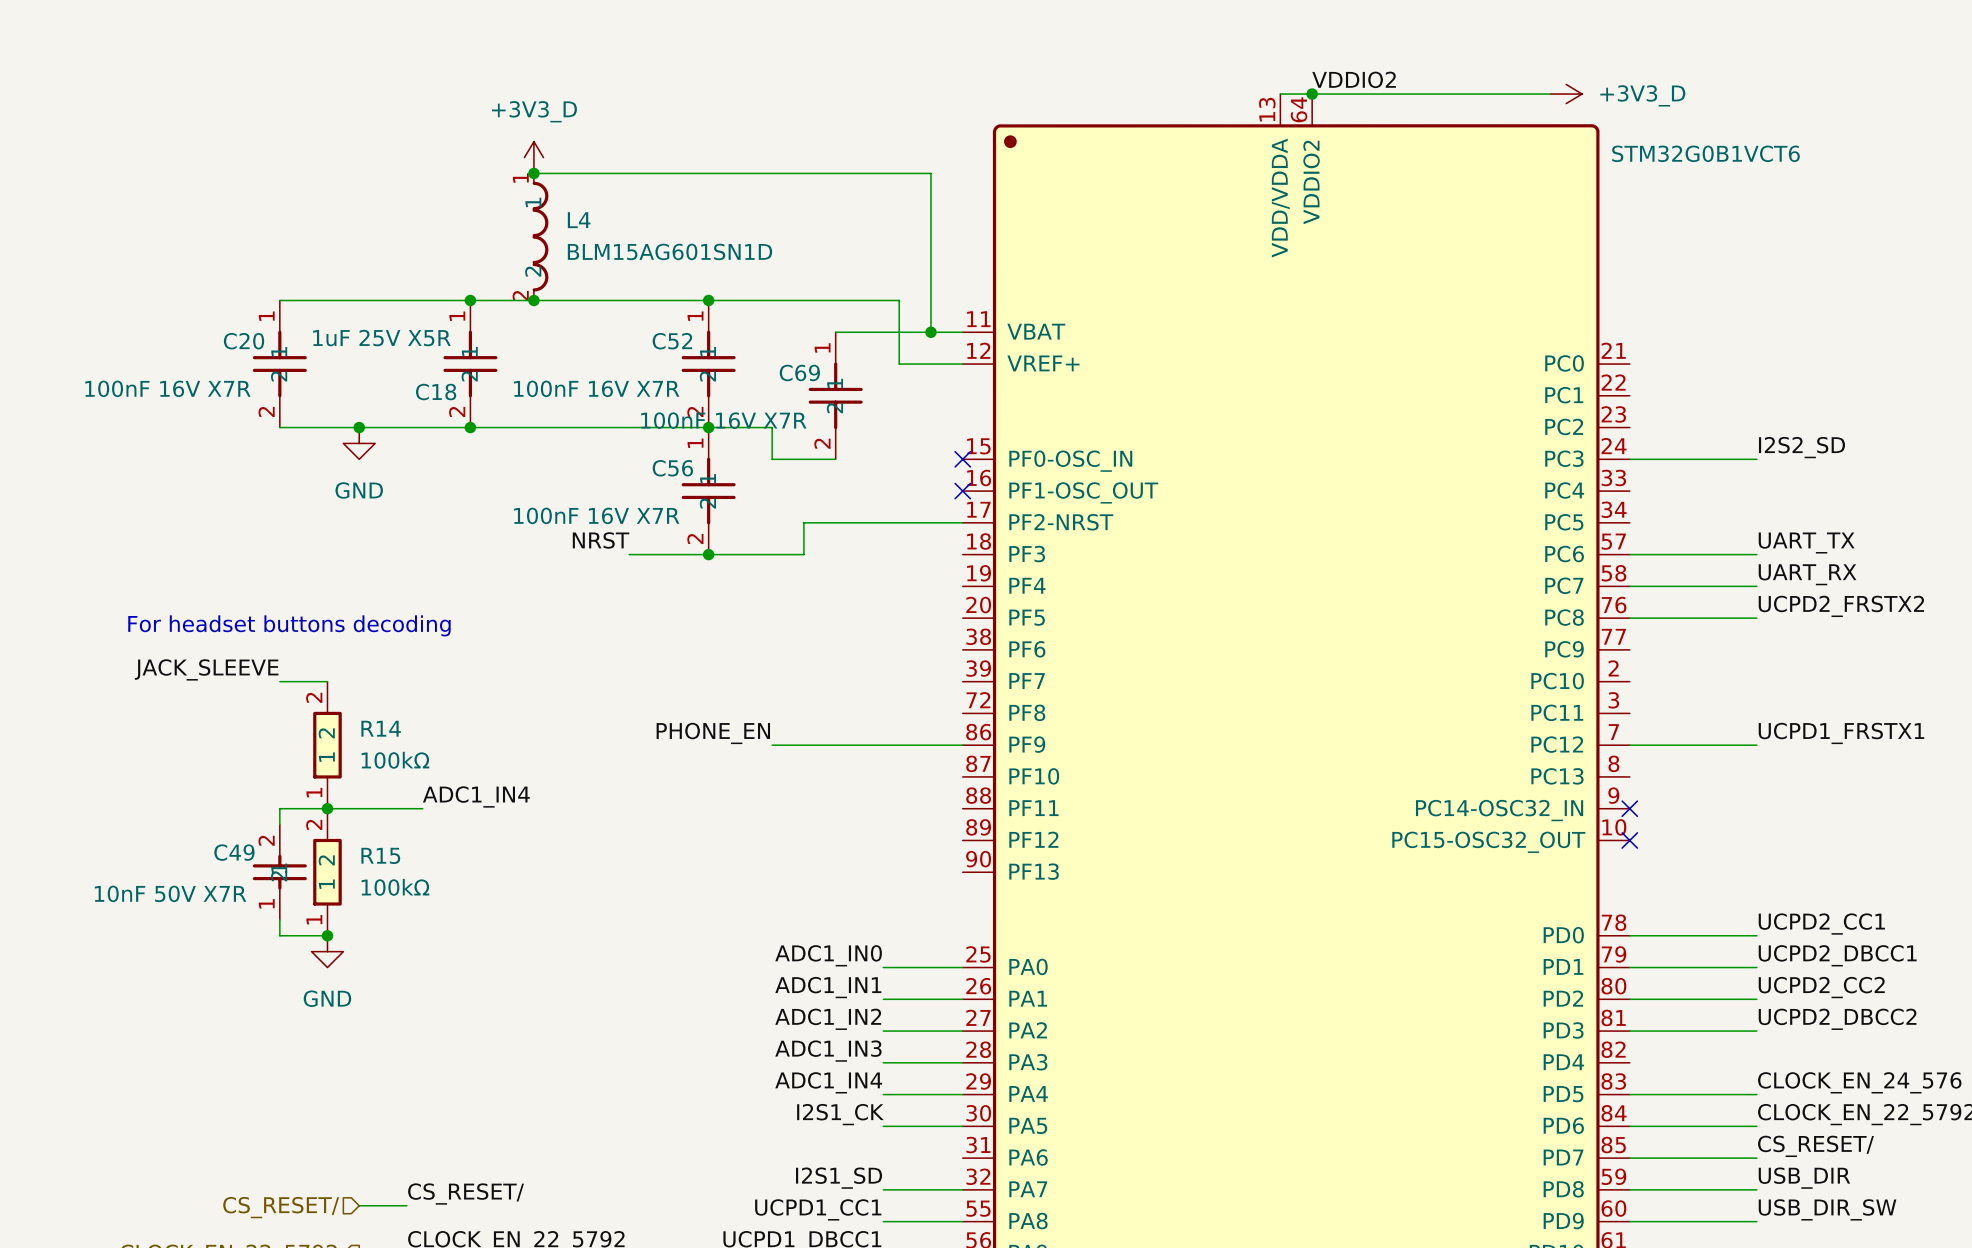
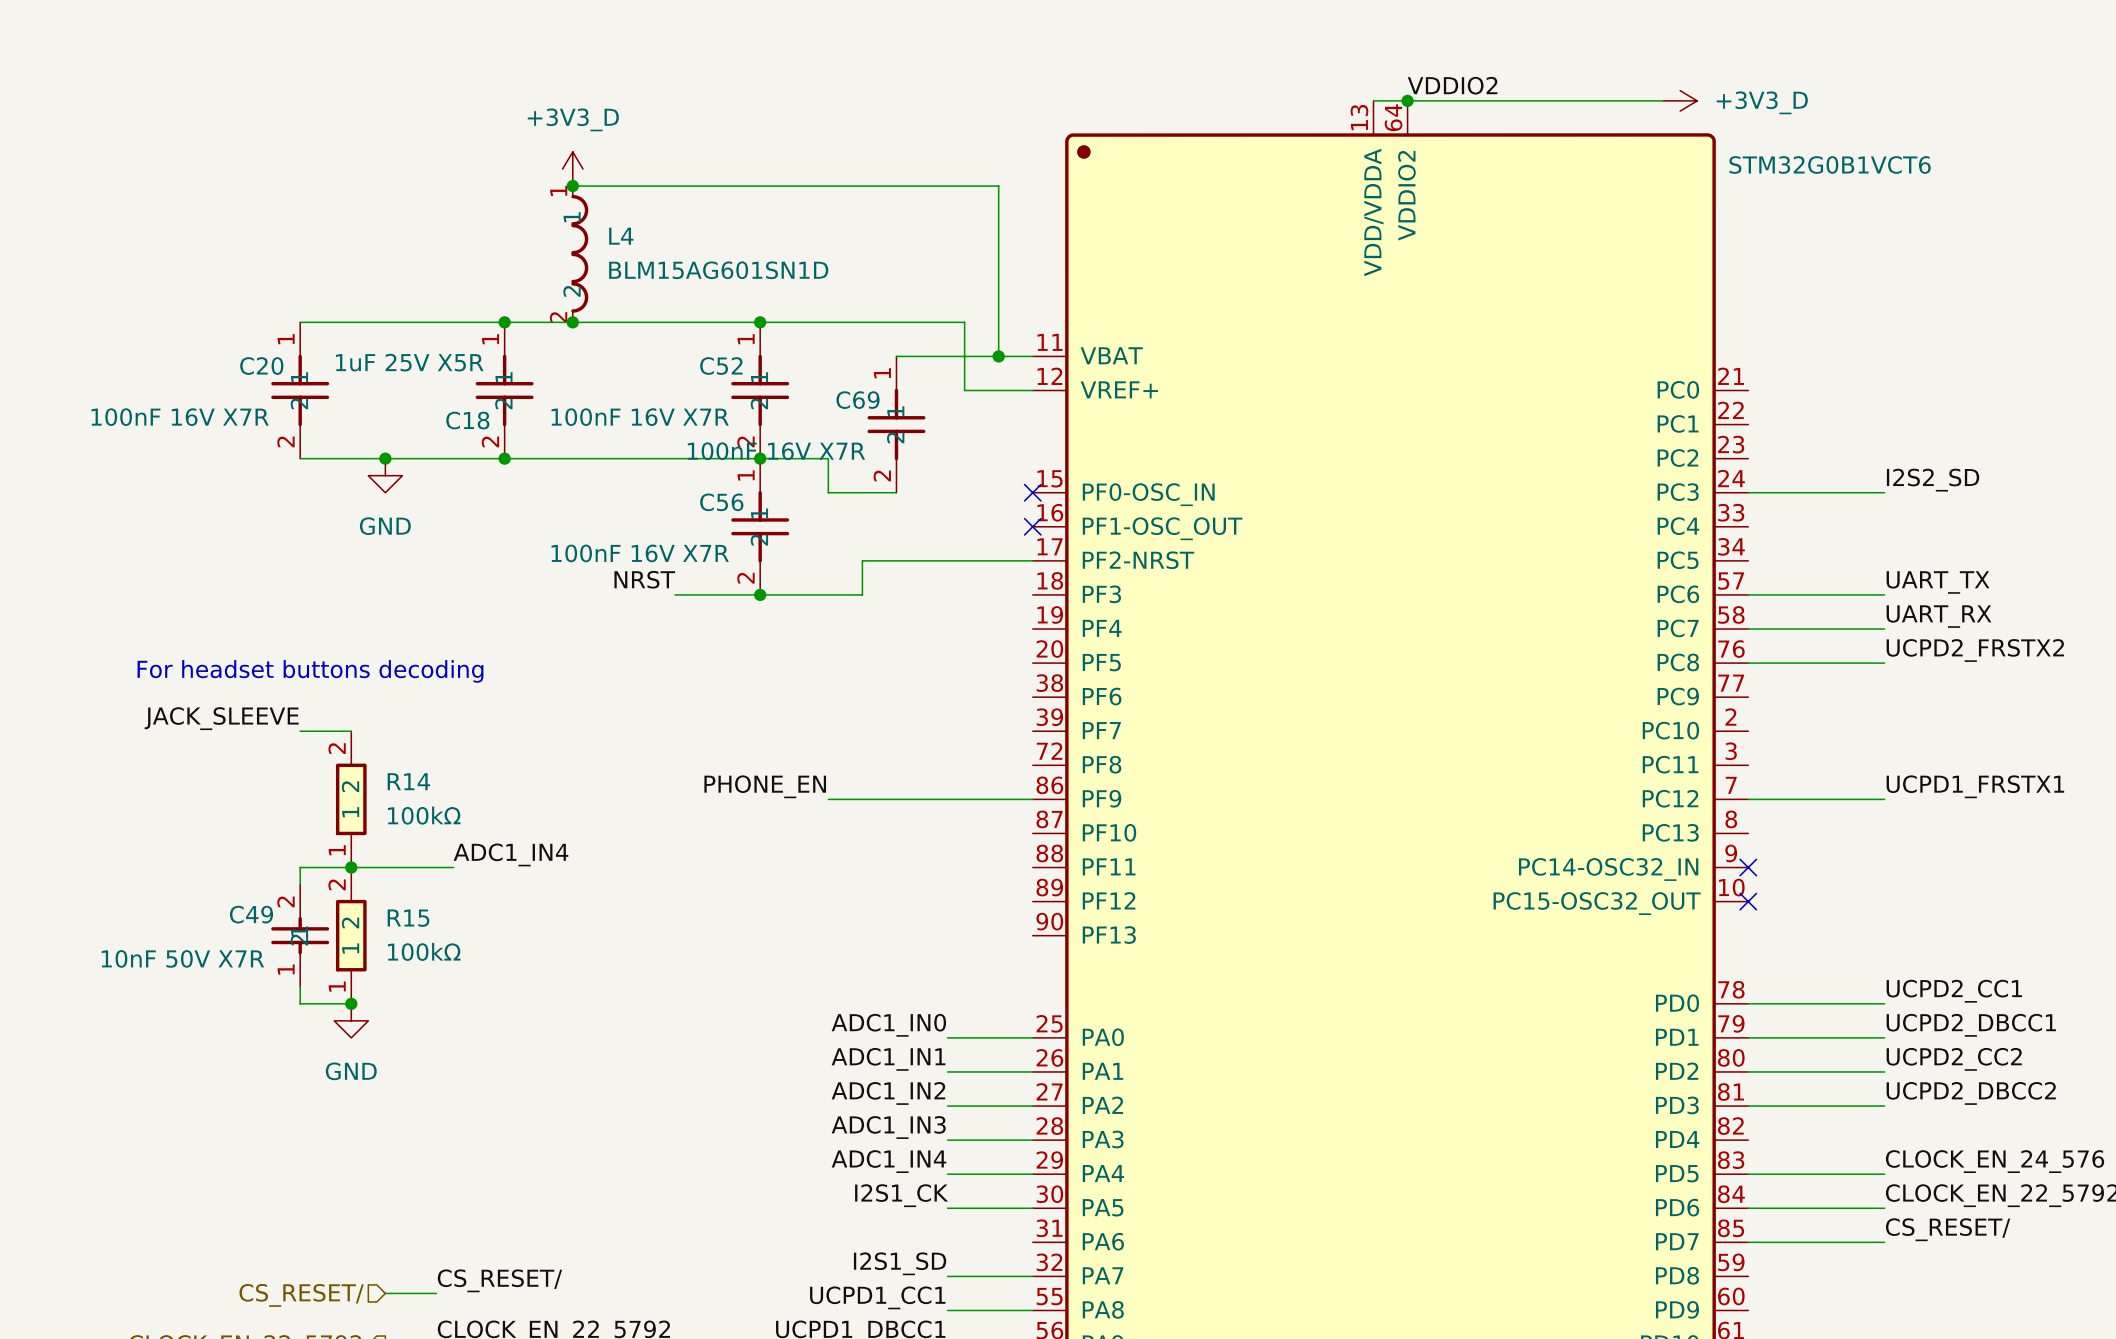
label: USB_DIR (1804, 1178) -> none
wire: (1629, 1189) (1756, 1189) -> none
label: USB_DIR_SW (1827, 1209) -> none
wire: (1629, 1221) (1756, 1221) -> none

